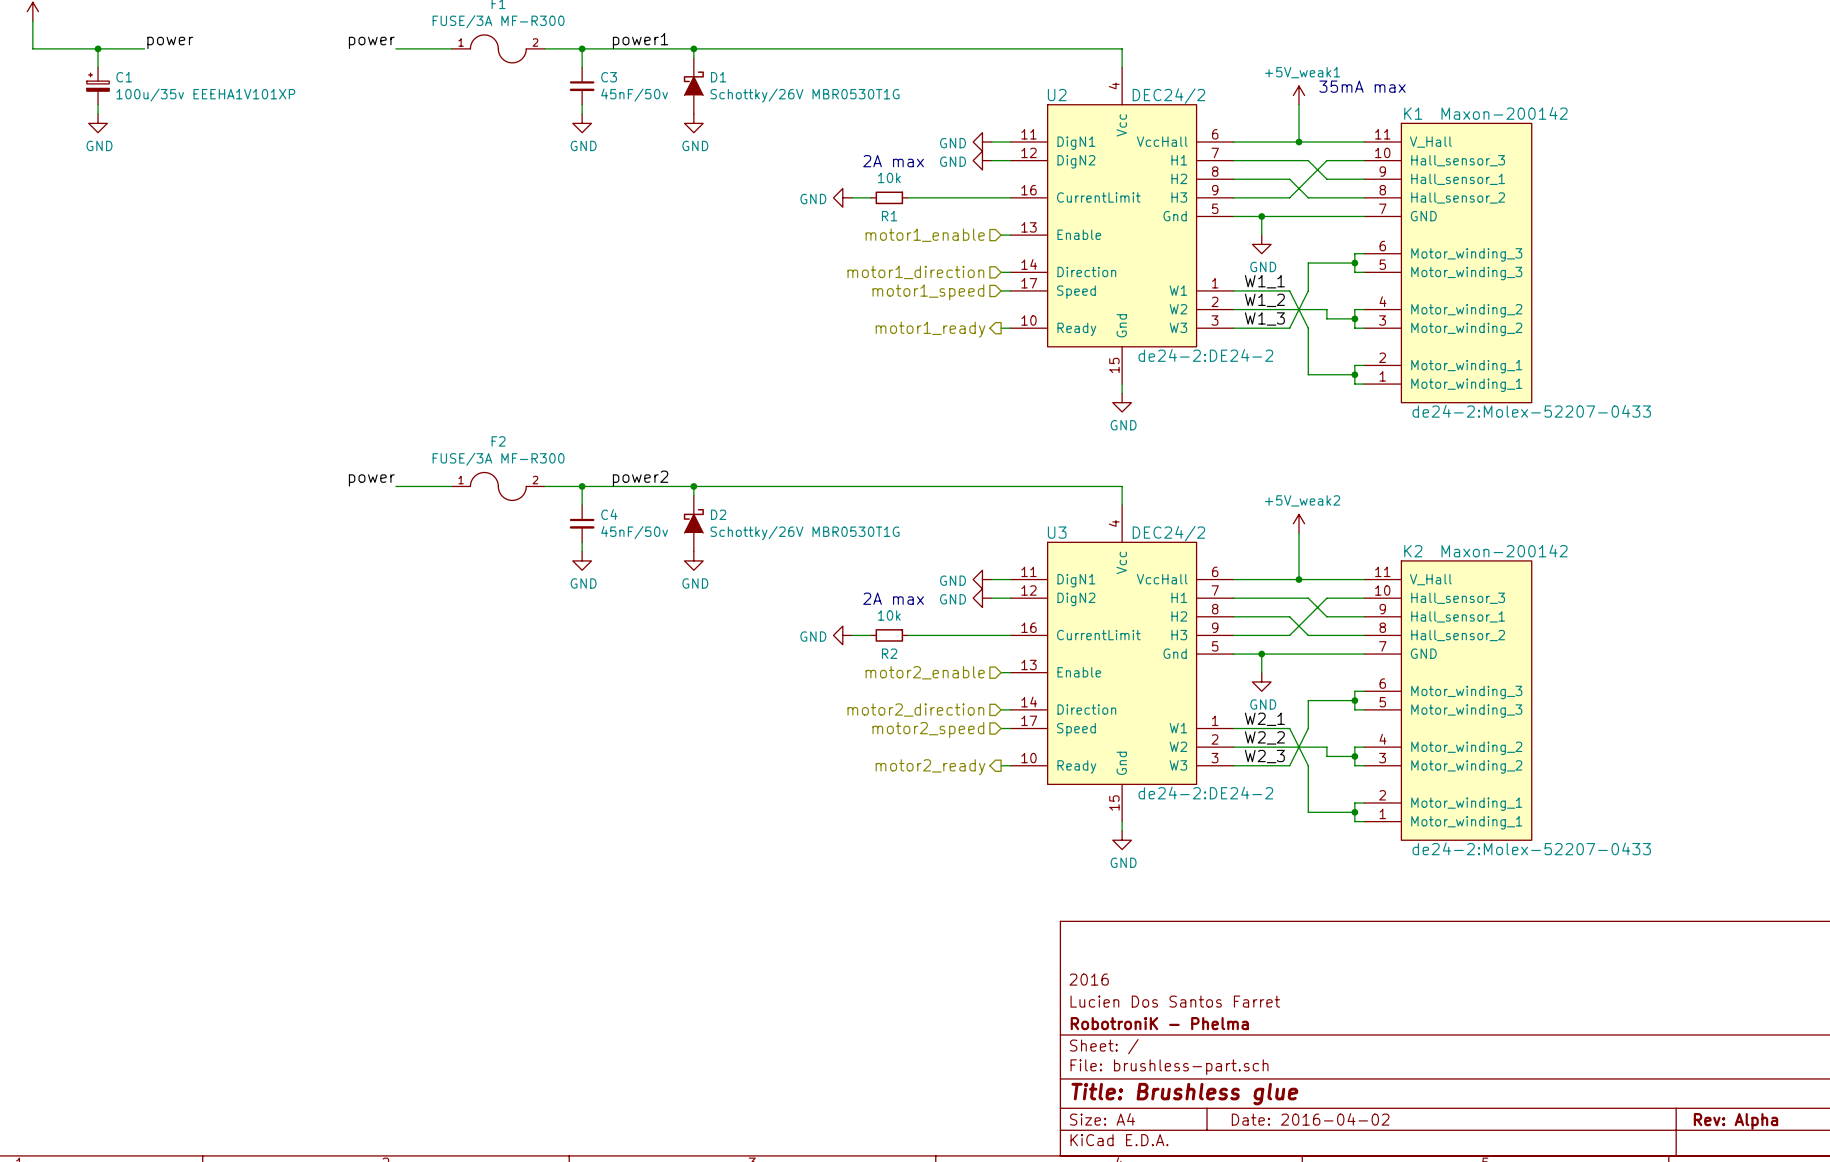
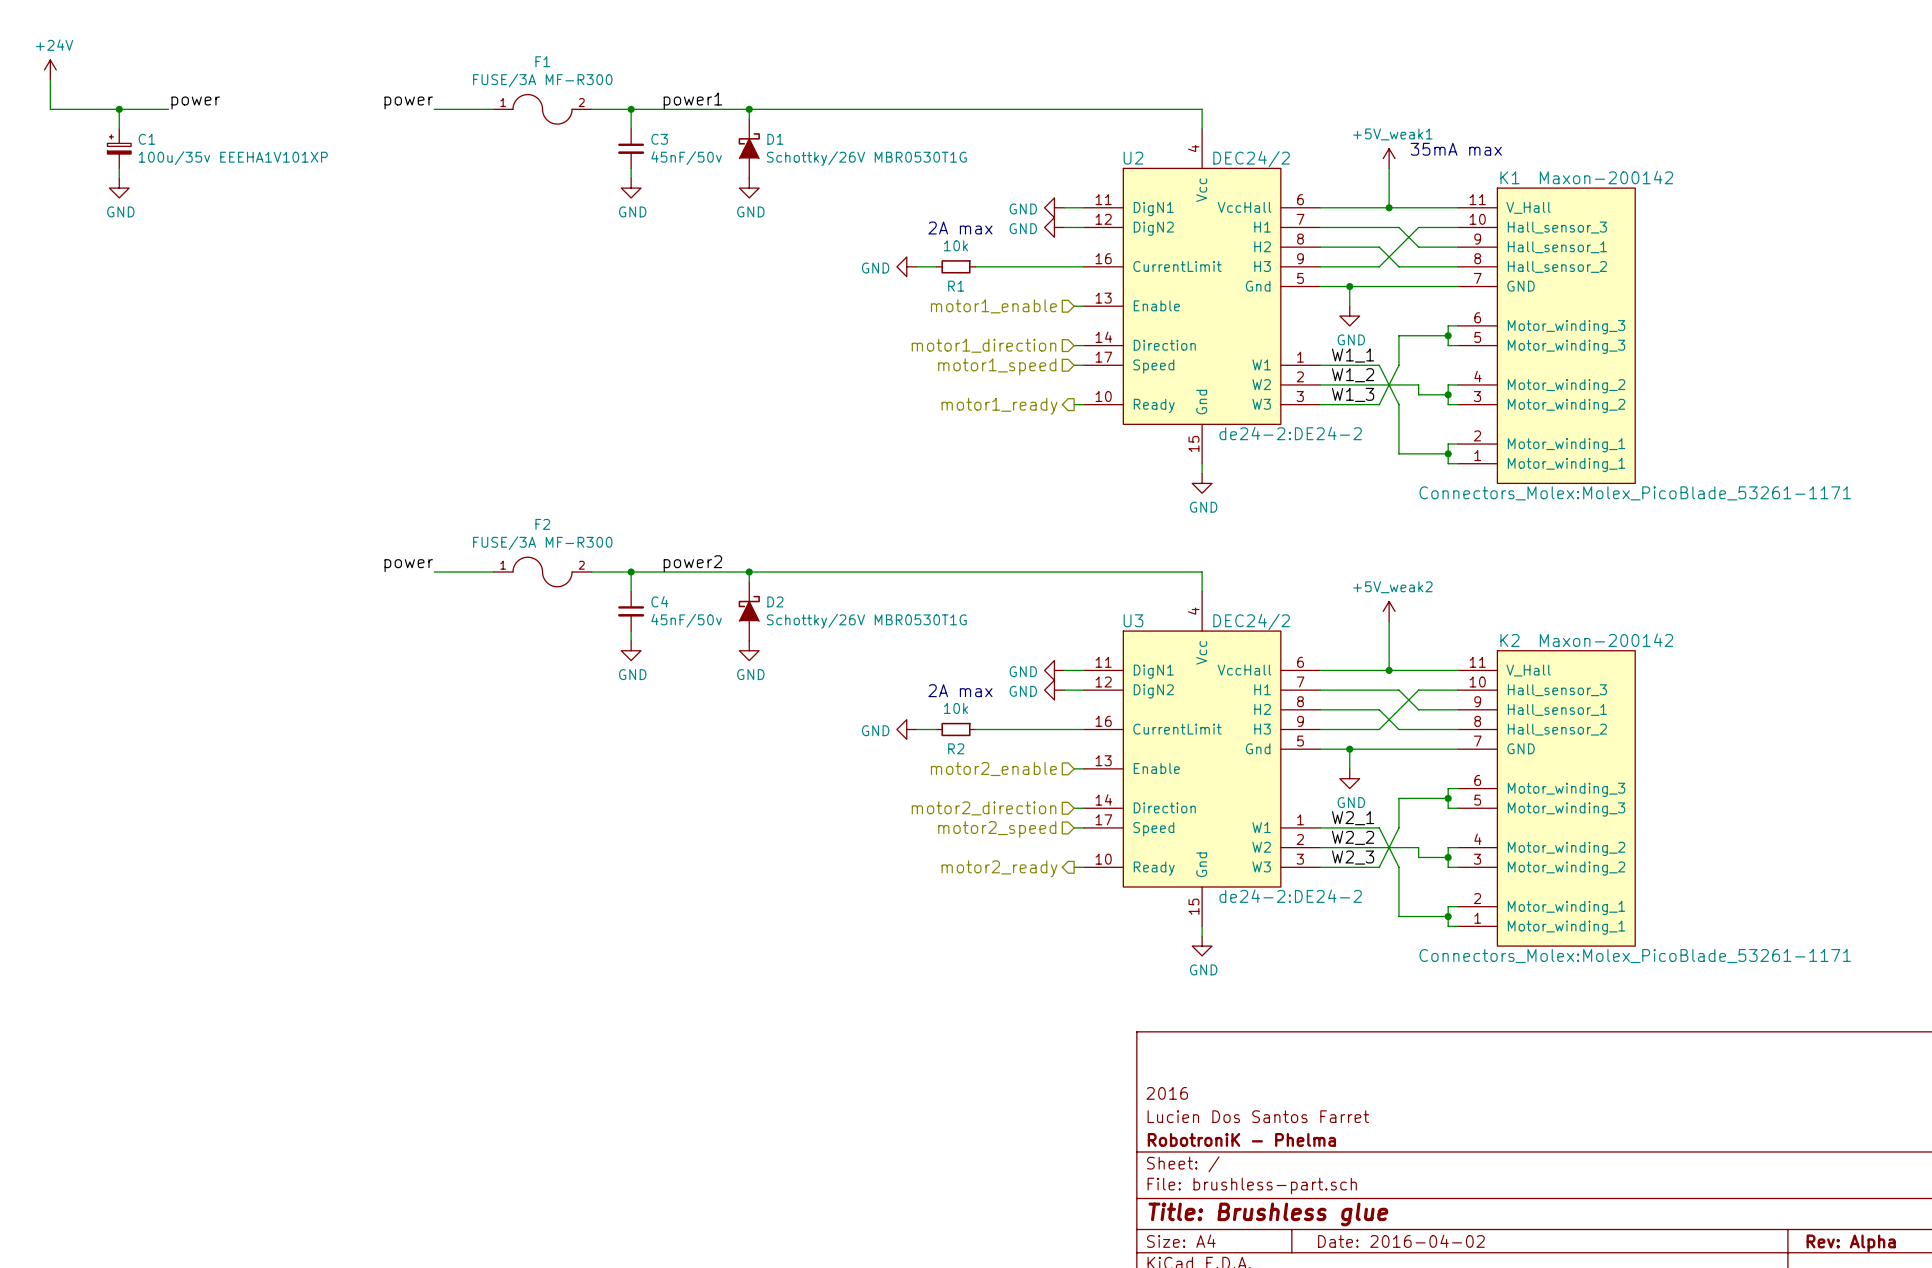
K1 text: de24-2:Molex-52207-0433 (1531, 411) -> Connectors_Molex:Molex_PicoBlade_53261-1171 (1635, 493)
K2 text: de24-2:Molex-52207-0433 (1531, 848) -> Connectors_Molex:Molex_PicoBlade_53261-1171 (1635, 956)

